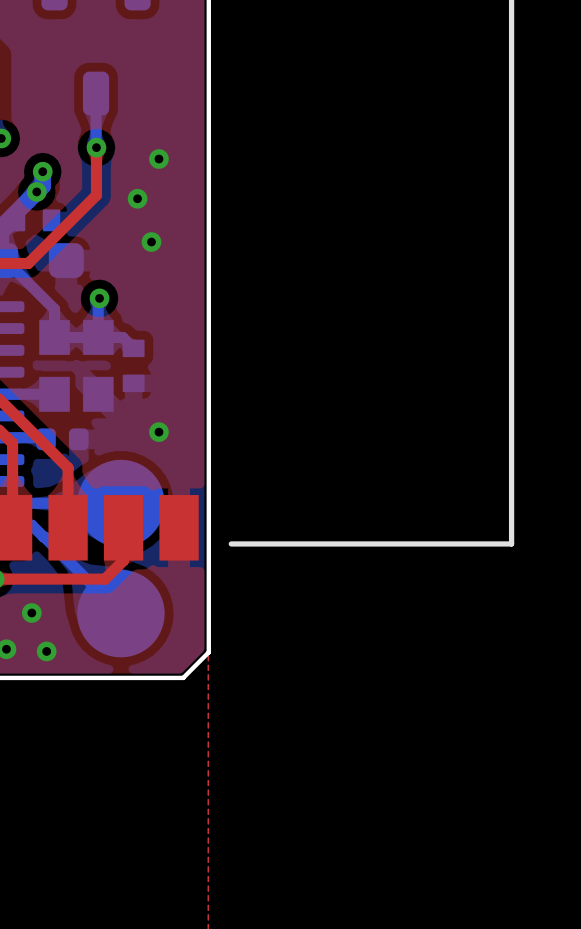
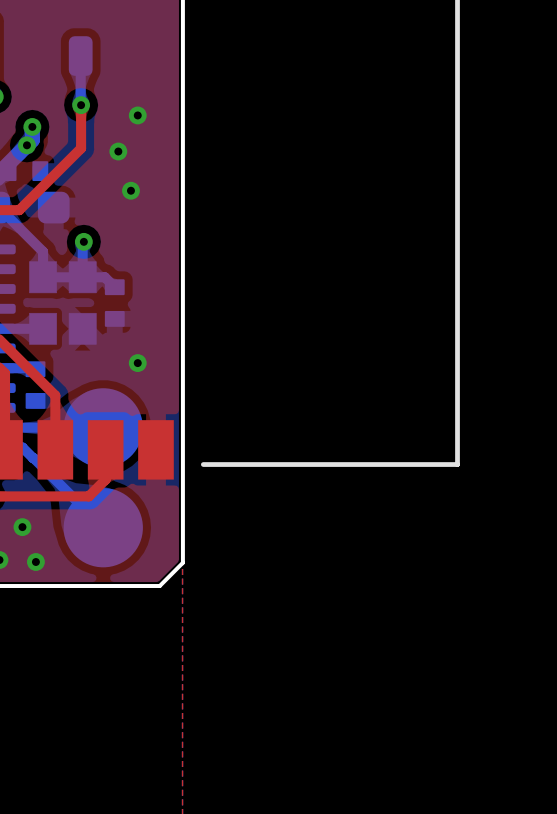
part footprint: [36, 428, 89, 451] -> [25, 361, 46, 409]

